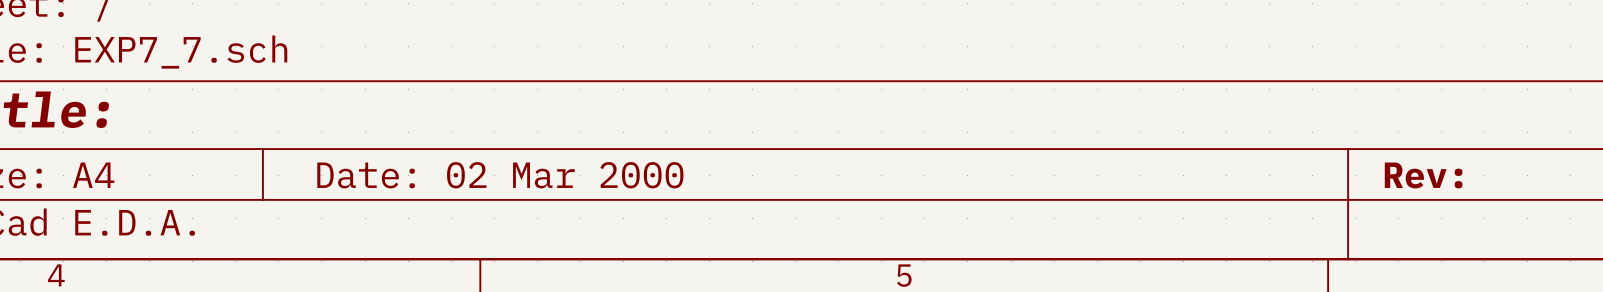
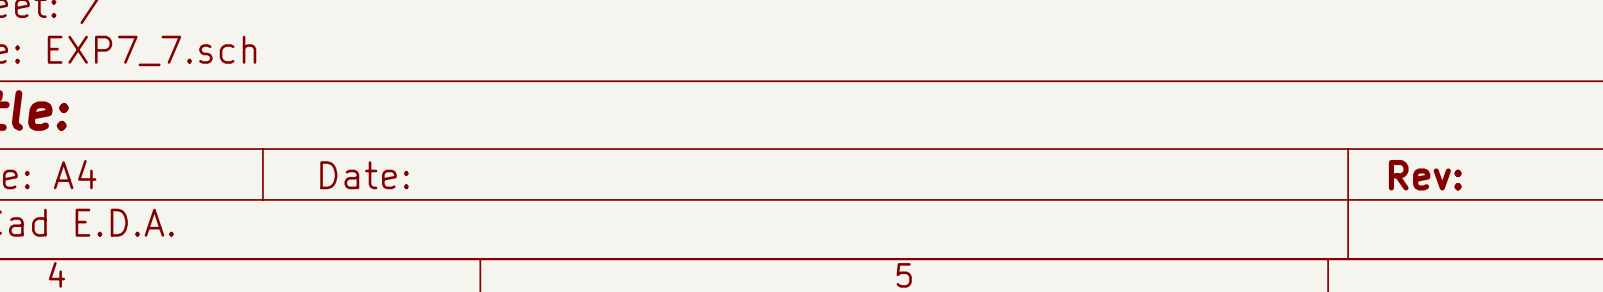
title block: Date: 02 Mar 2000 (500, 175) -> Date: (364, 175)

